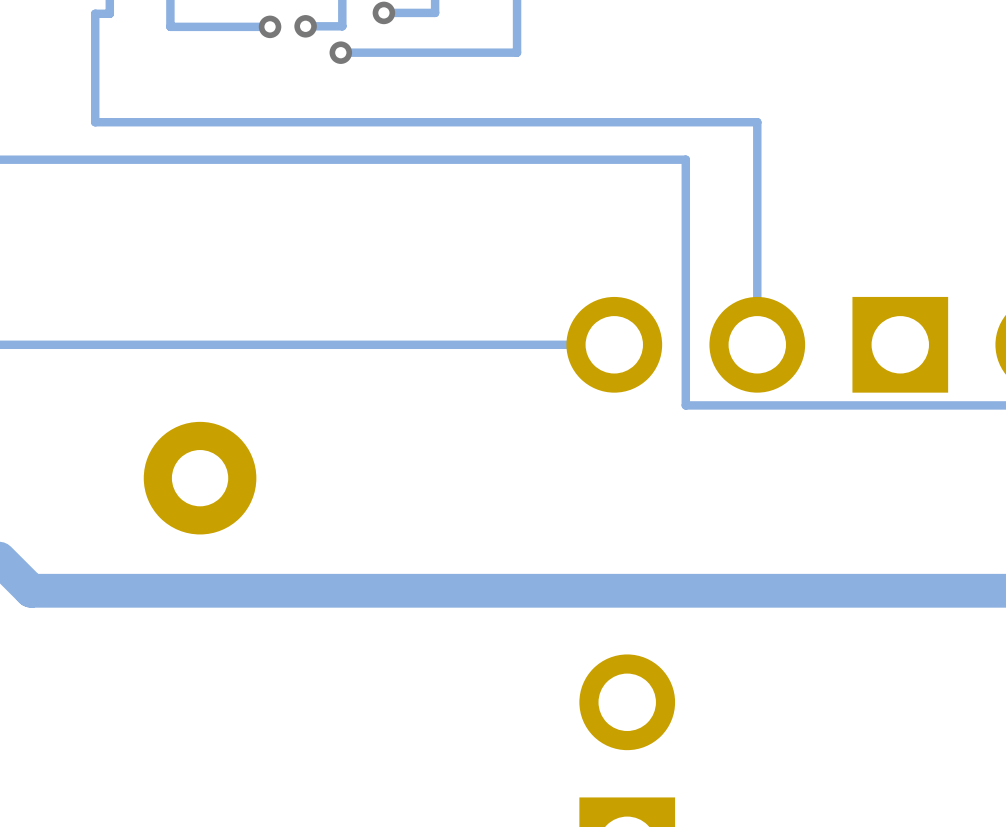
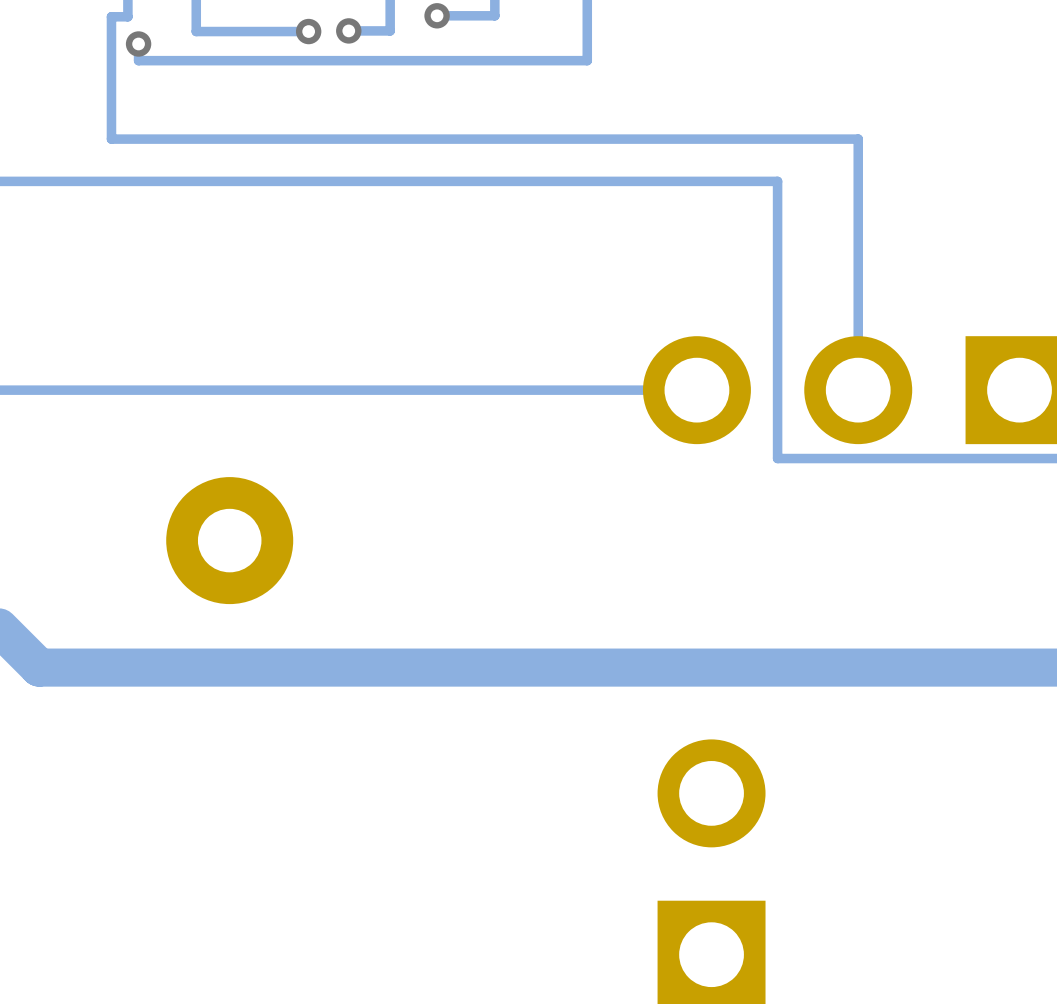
track: none -> (138, 43) (138, 60) (388, 60)
via: none -> (138, 43)
via: (340, 52) -> none

